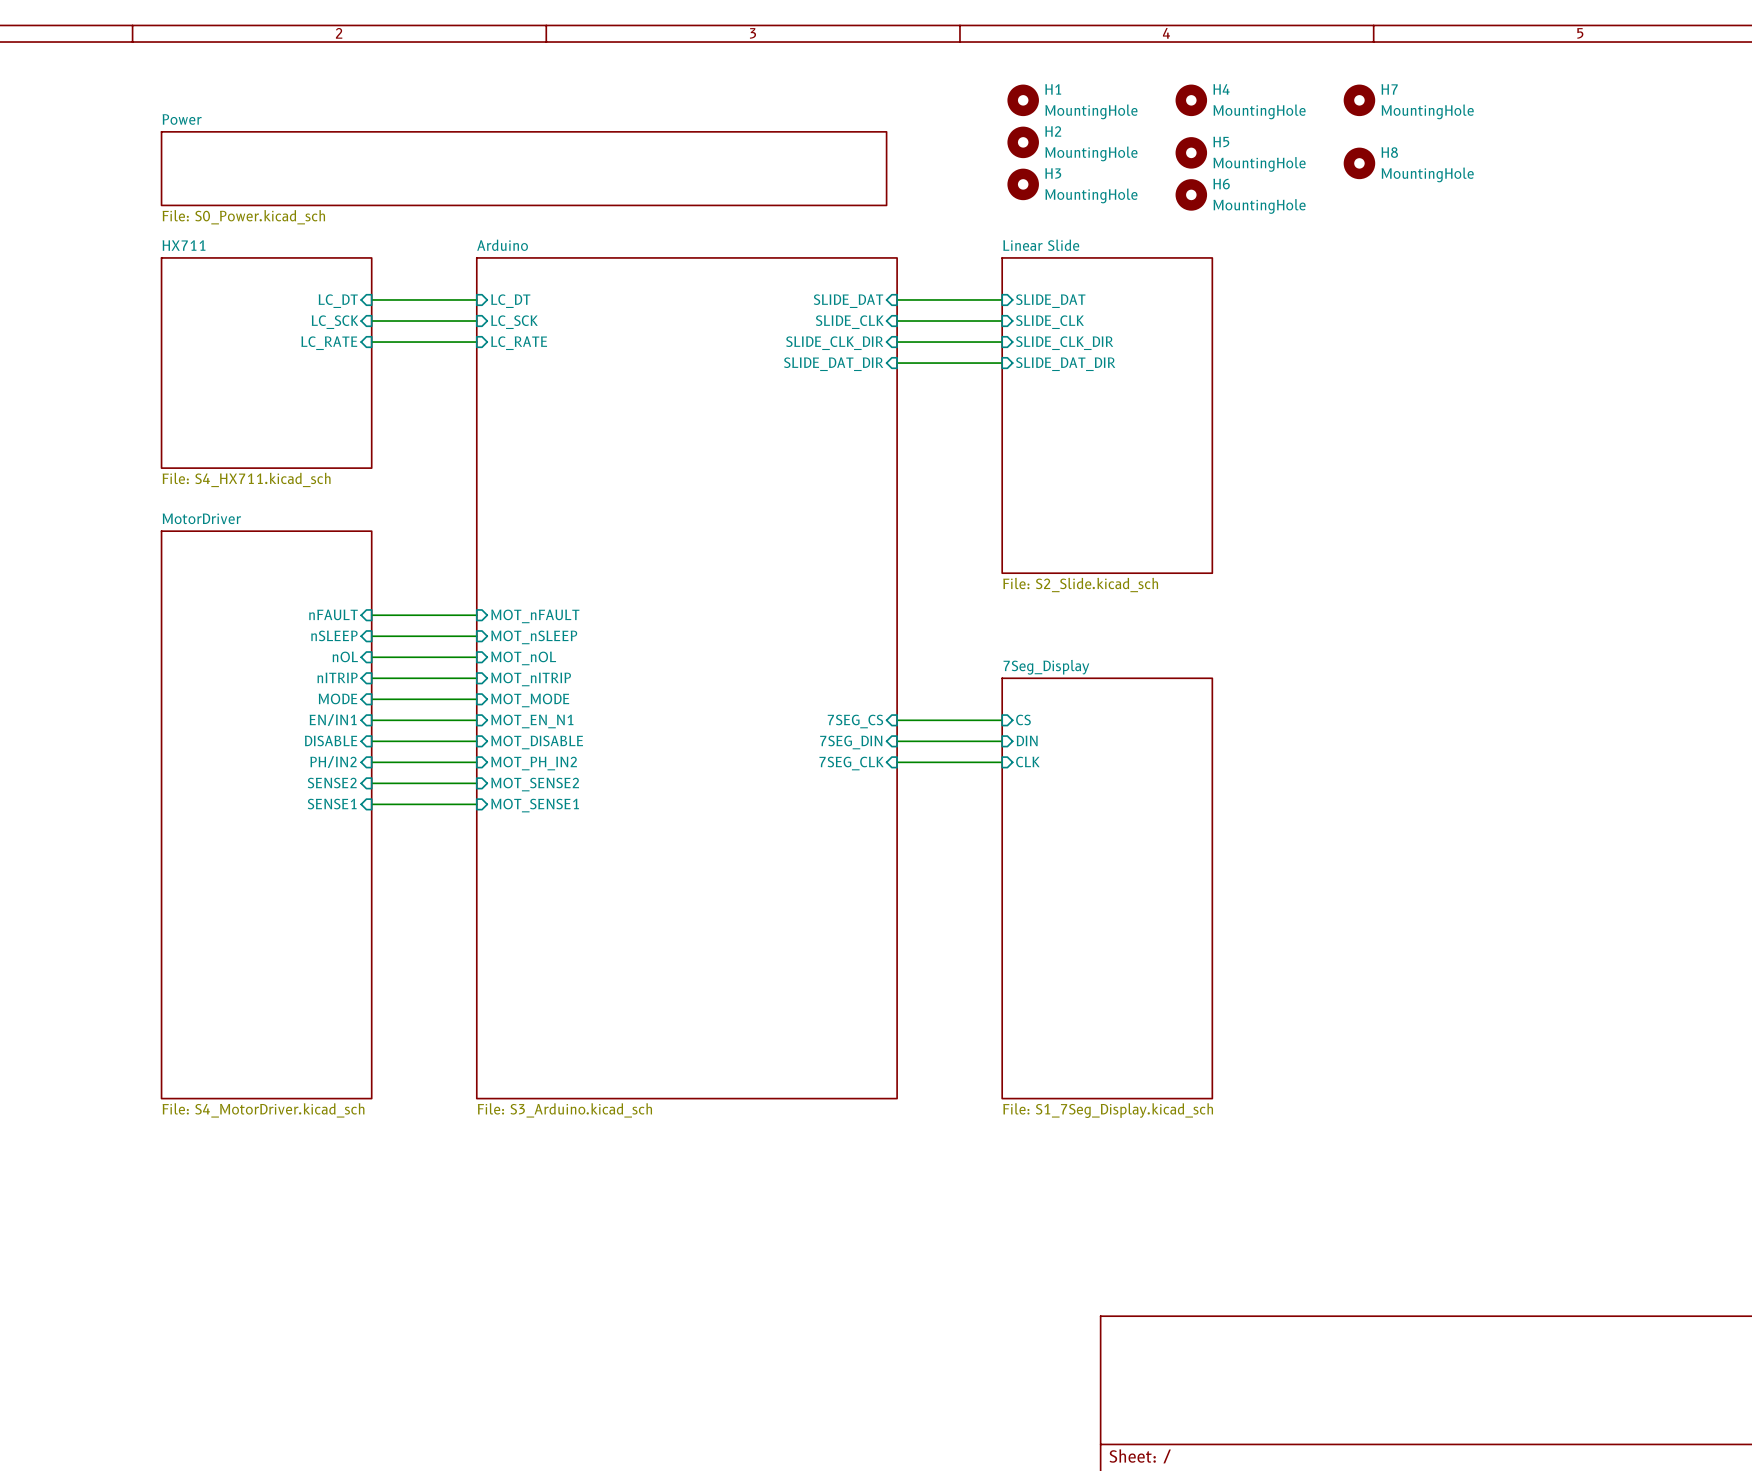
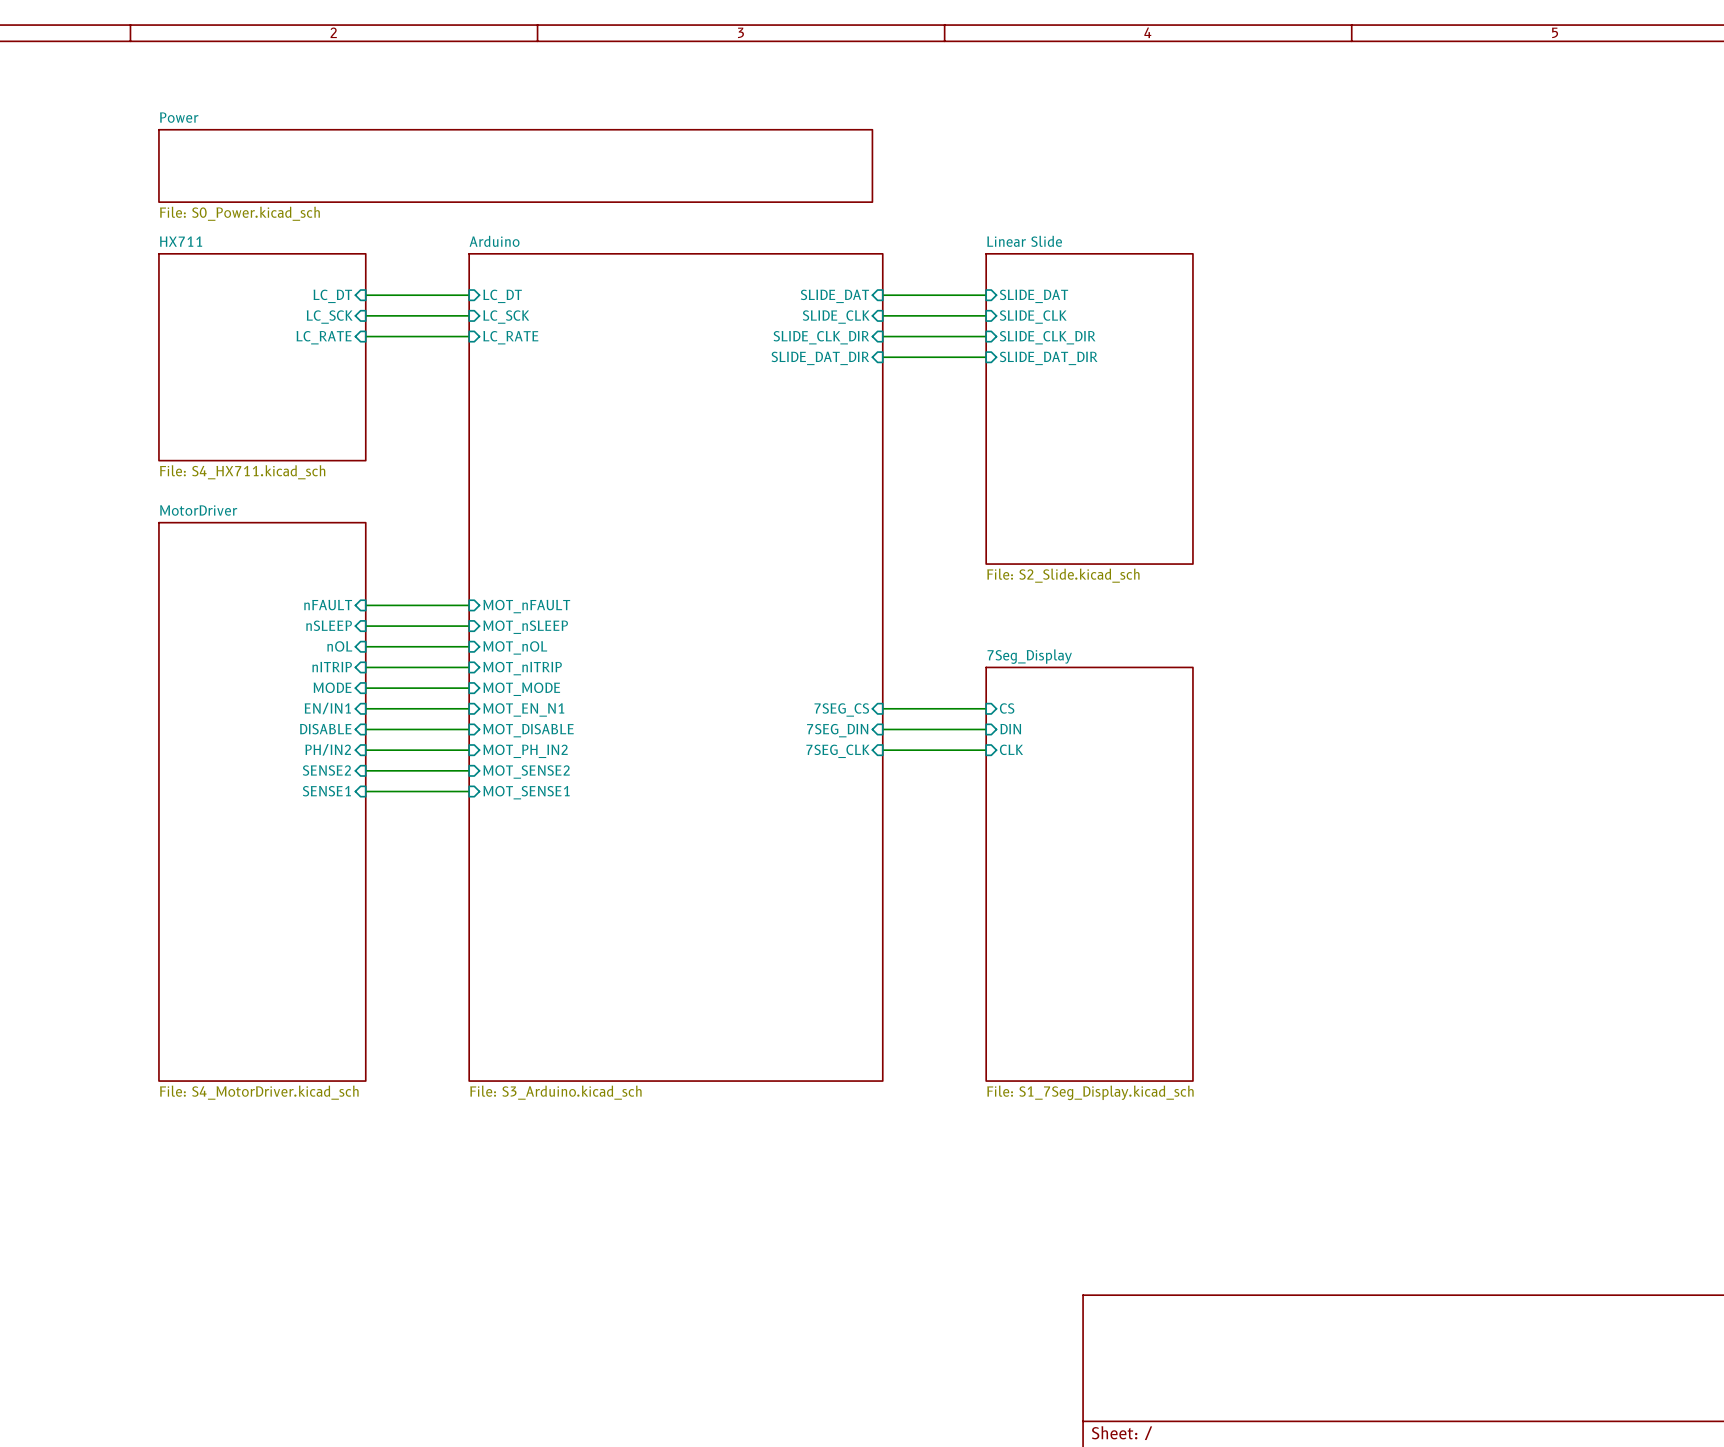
H1: MountingHole (1023, 100) -> none
H4: MountingHole (1191, 100) -> none
H7: MountingHole (1359, 100) -> none
H2: MountingHole (1023, 142) -> none
H5: MountingHole (1191, 152) -> none
H8: MountingHole (1359, 163) -> none
H3: MountingHole (1023, 184) -> none
H6: MountingHole (1191, 194) -> none

